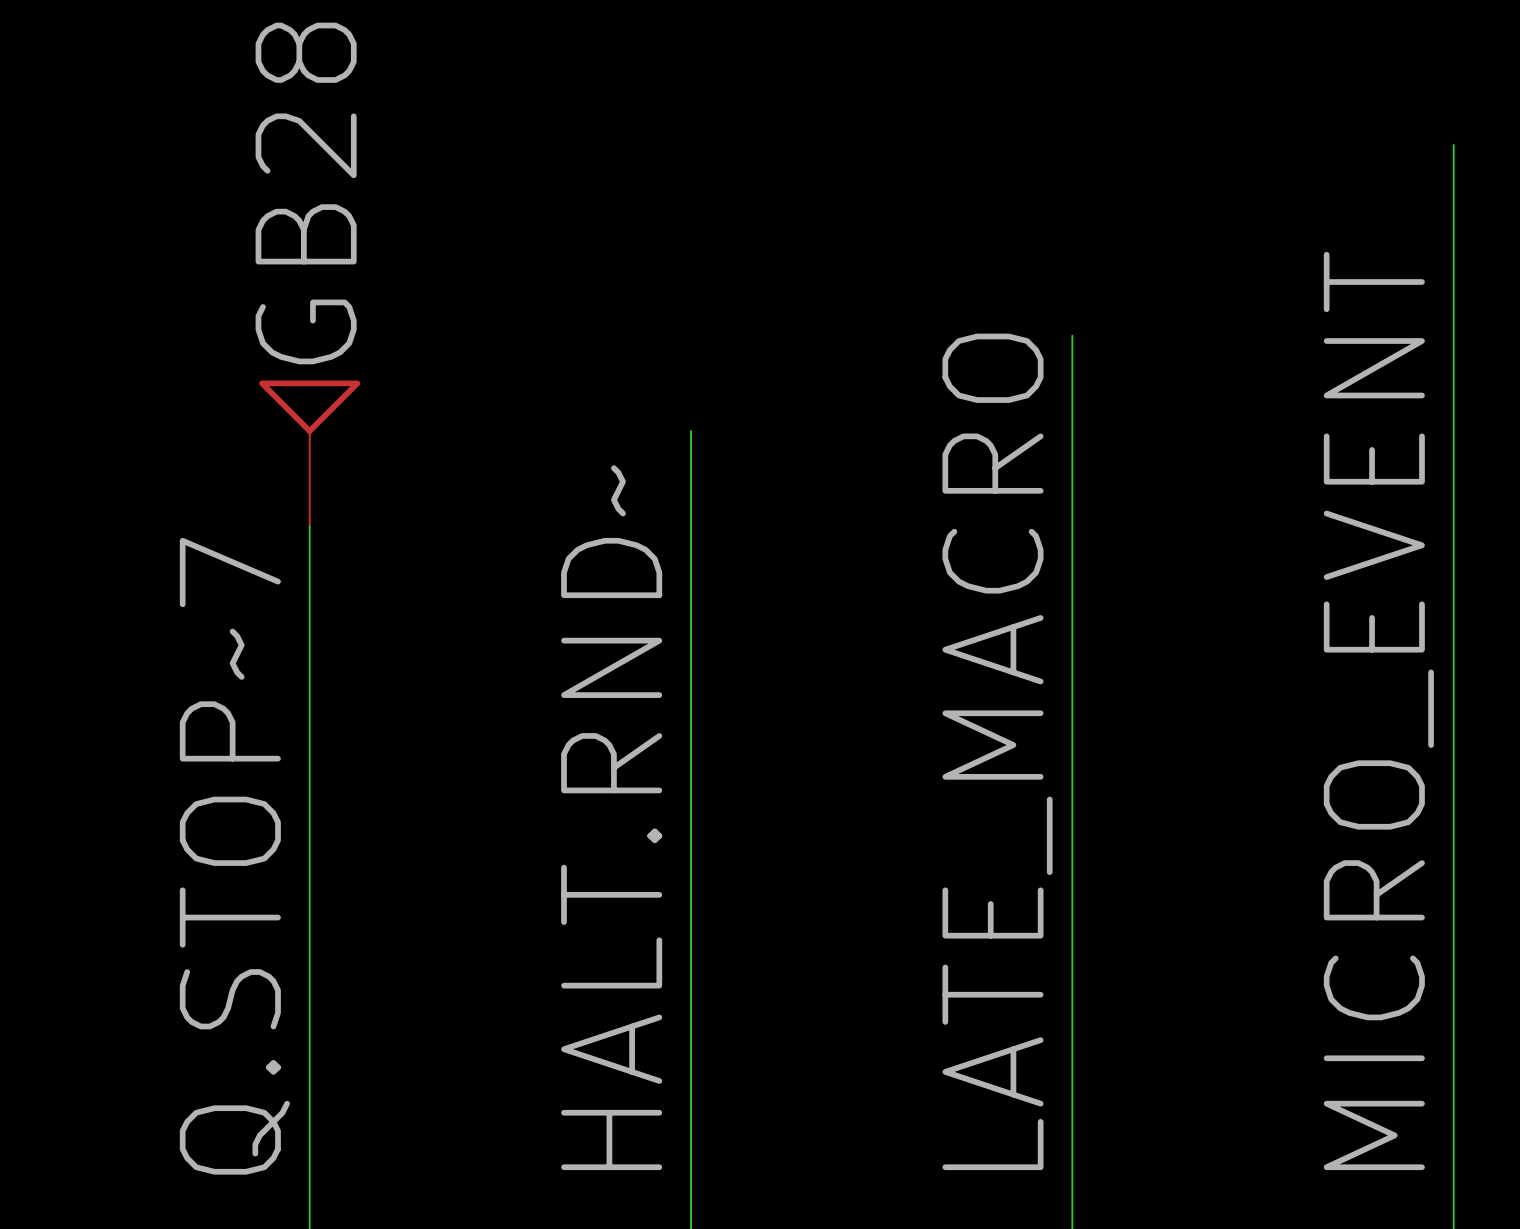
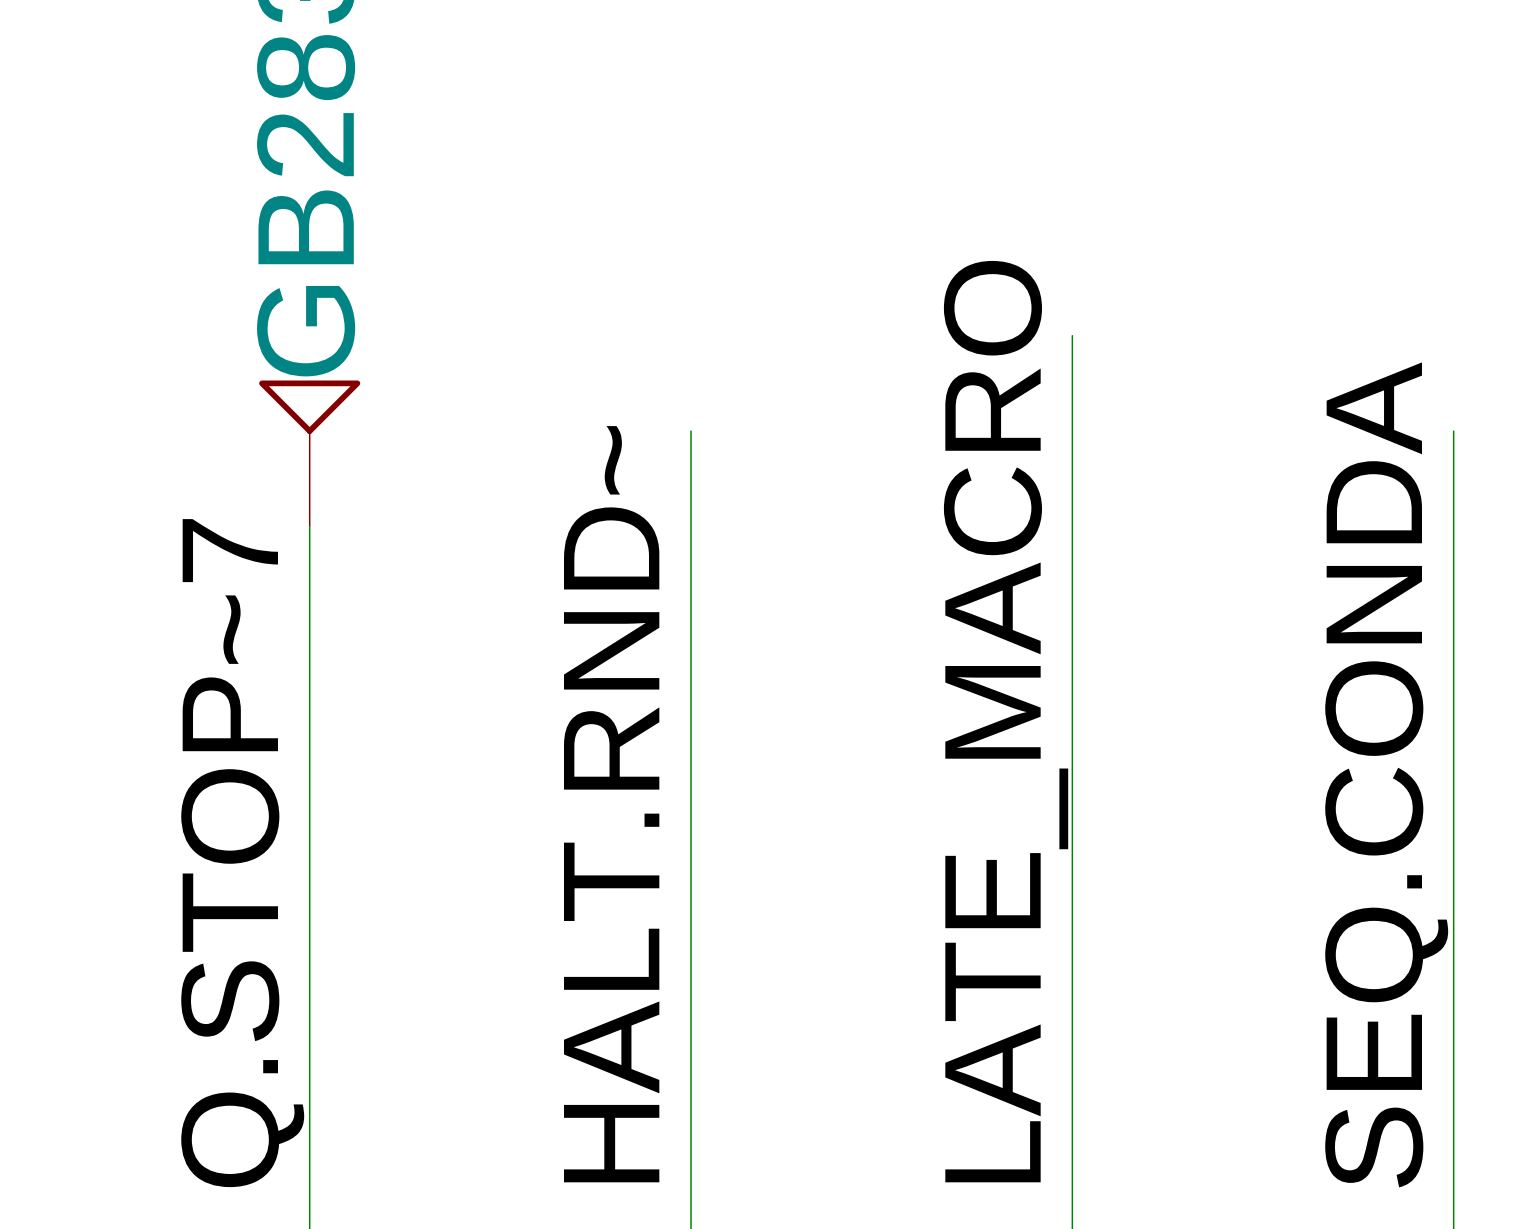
wire: (1453, 145) (1453, 431) -> none
label: MICRO_EVENT (1378, 710) -> SEQ.CONDA (1386, 774)

